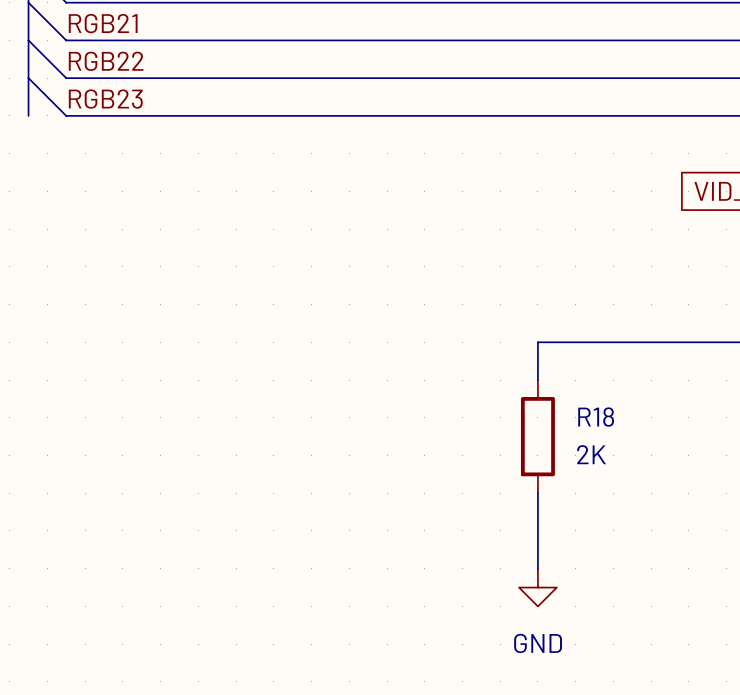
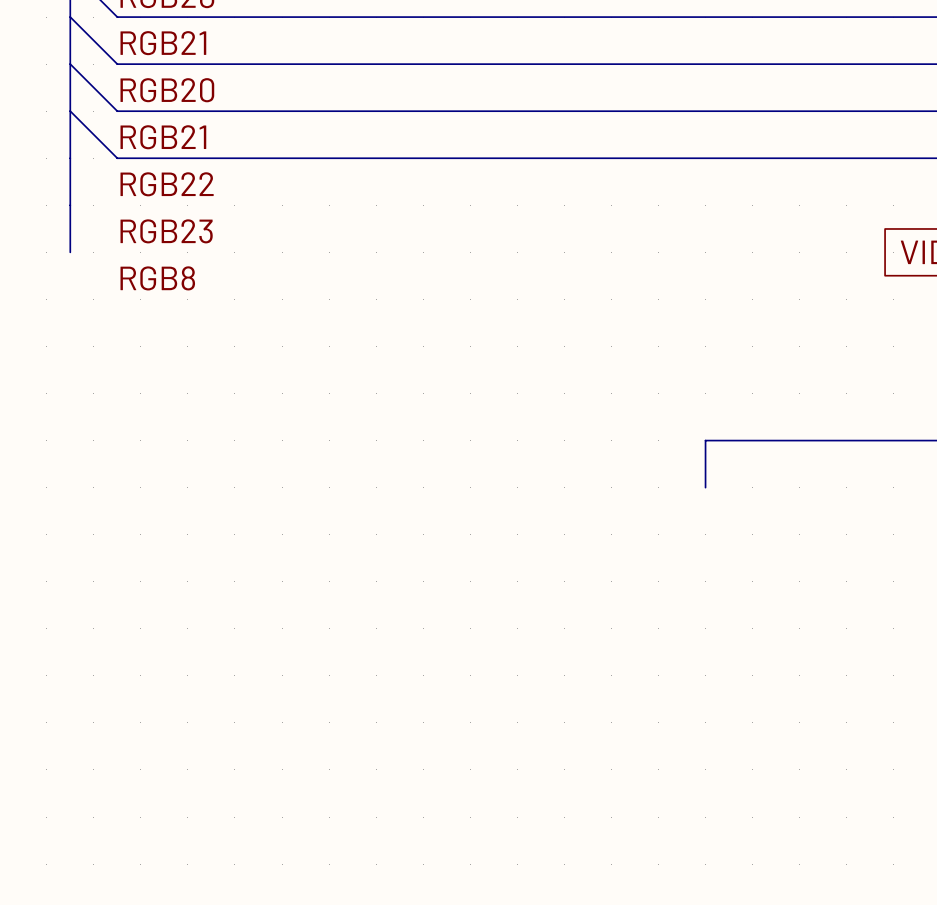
label: RGB22 (106, 61) -> RGB20 (167, 90)
label: RGB23 (105, 99) -> RGB21 (163, 137)
bus: none -> (70, 158) (70, 252)
label: none -> RGB22 (167, 184)
label: none -> RGB23 (166, 231)
label: none -> RGB8 (157, 278)
R18: 2K (537, 436) -> none
wire: (537, 493) (537, 568) -> none
power symbol: GND (537, 587) -> none

